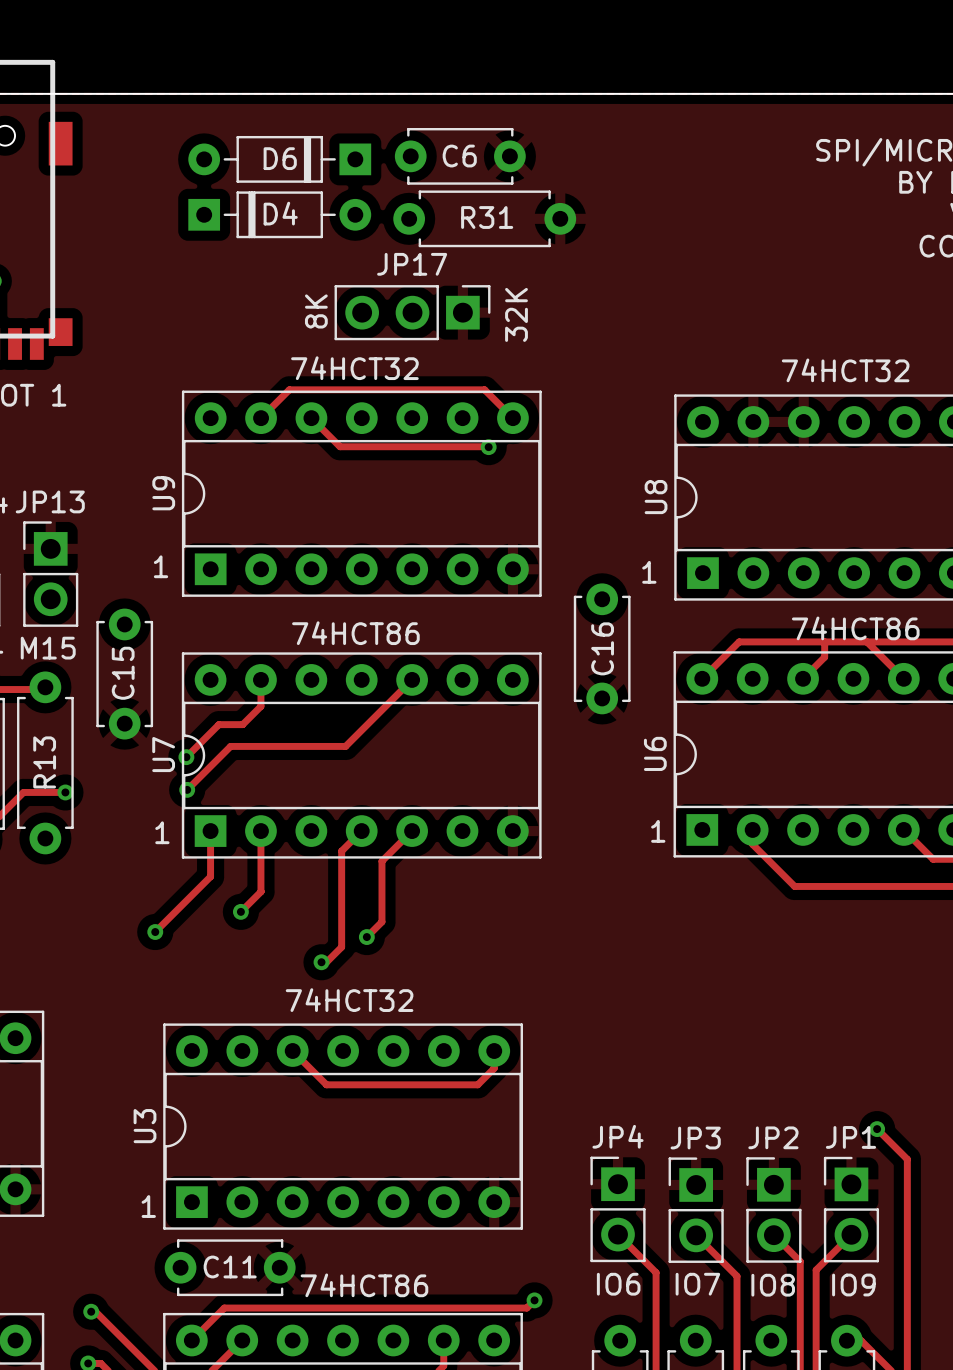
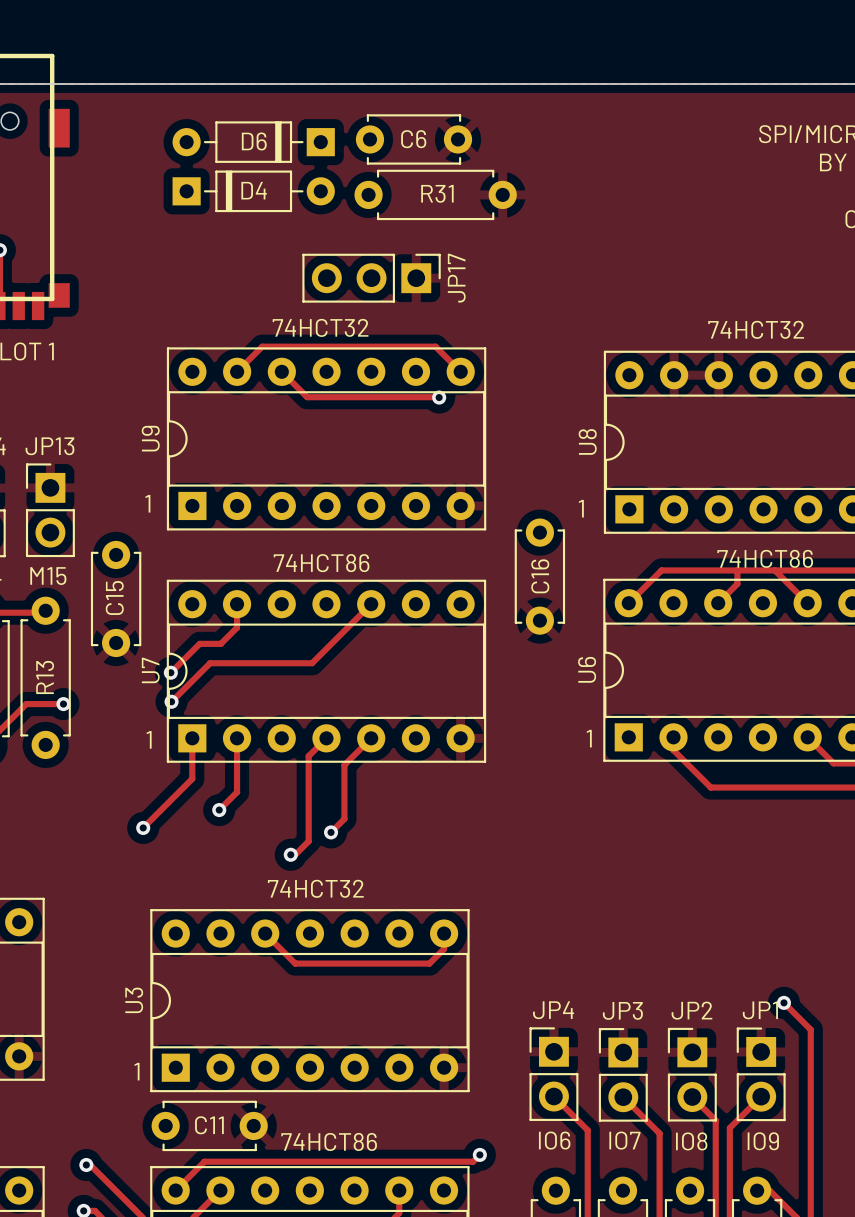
JP17 name rotation: 0° (412, 264) -> 90° counterclockwise (456, 278)
JP17 name position: JP17 (412, 264) -> JP17 (456, 278)
text: 8K (316, 311) -> none
text: 32K (516, 314) -> none

